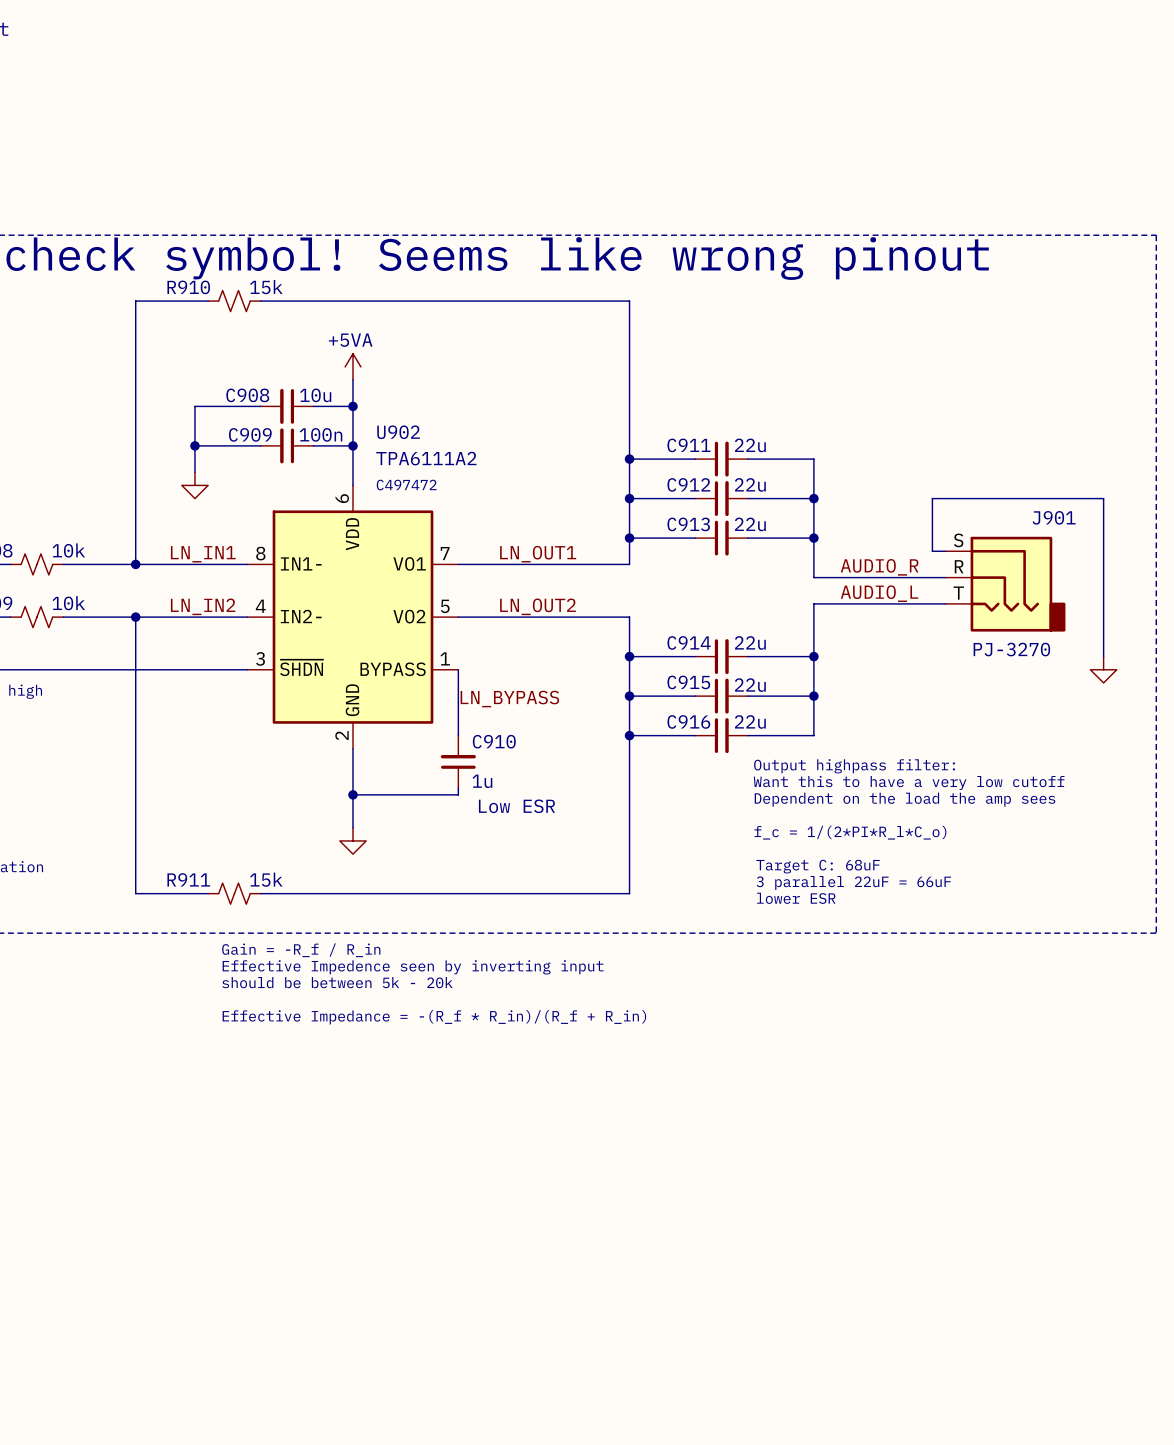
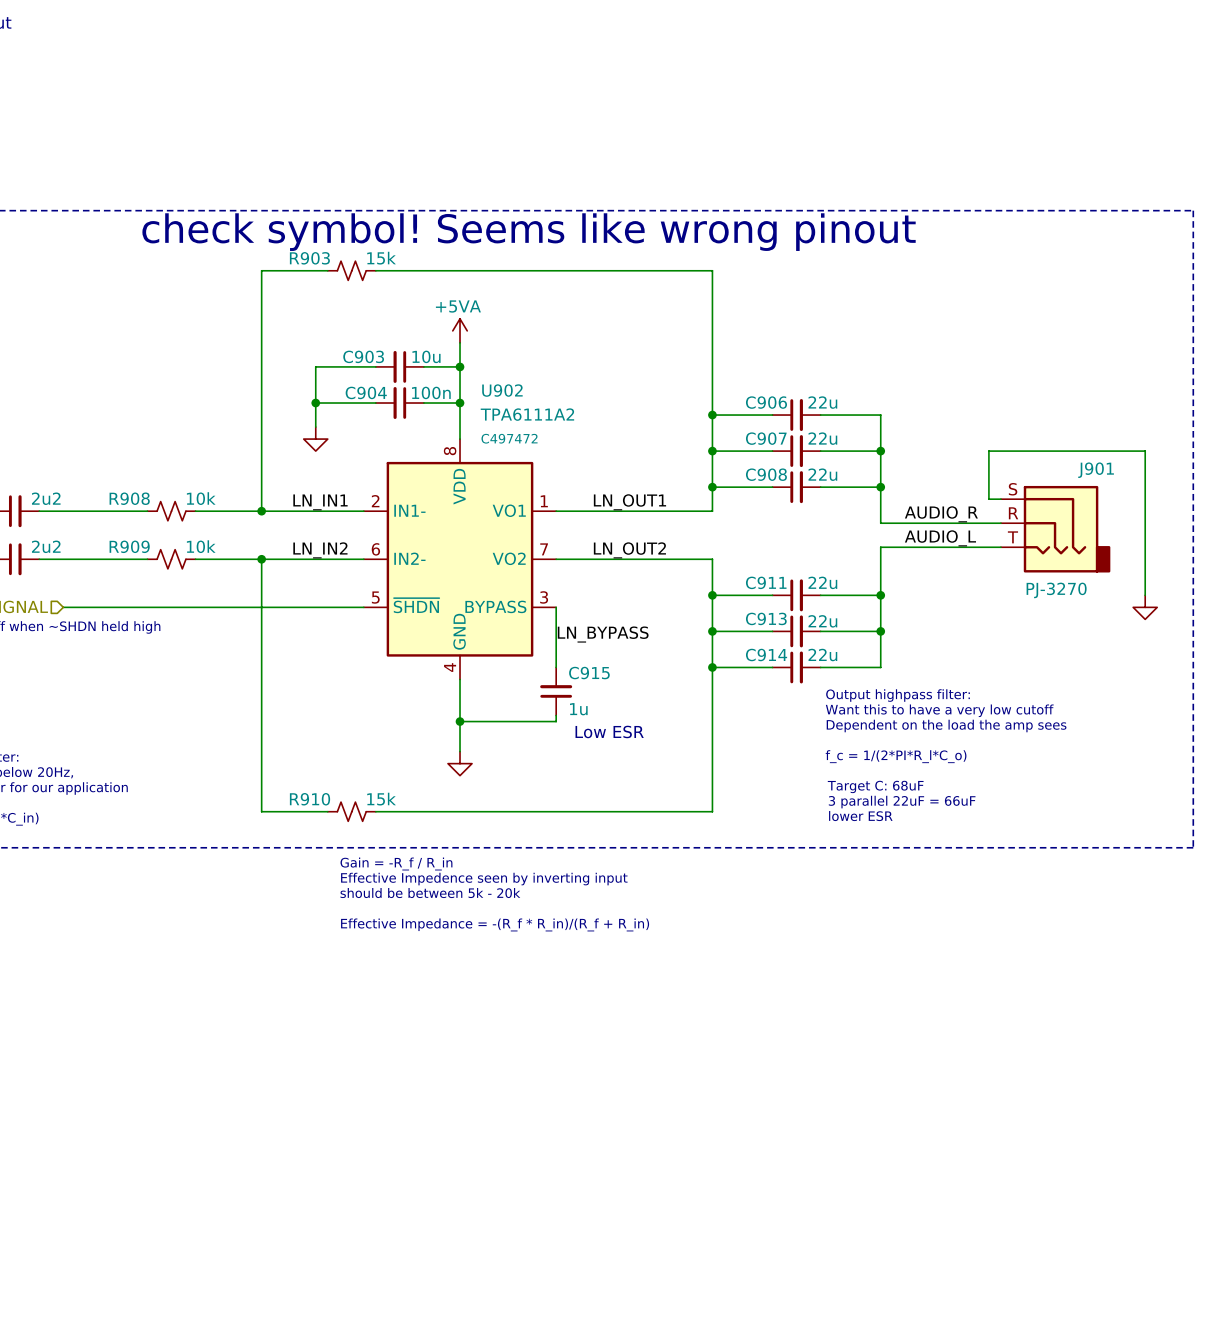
R910 name: R910 (188, 287) -> R903 (309, 258)
C908 name: C908 (247, 395) -> C903 (363, 356)
C909 name: C909 (250, 434) -> C904 (366, 392)
C911 name: C911 (689, 445) -> C906 (766, 402)
C912 name: C912 (688, 484) -> C907 (766, 438)
U902 pin number: 6 (342, 498) -> 8 (450, 451)
C913 name: C913 (688, 524) -> C908 (766, 474)
U902 pin number: 8 (260, 553) -> 2 (375, 501)
U902 pin number: 7 (445, 553) -> 1 (544, 501)
U902 pin number: 4 (260, 606) -> 6 (375, 549)
U902 pin number: 5 (445, 606) -> 7 (544, 549)
C914 name: C914 (689, 642) -> C911 (766, 582)
U902 pin number: 3 (260, 658) -> 5 (375, 597)
U902 pin number: 1 (445, 658) -> 3 (544, 597)
C915 name: C915 (688, 682) -> C913 (766, 618)
C916 name: C916 (688, 721) -> C914 (766, 655)
U902 pin number: 2 (342, 735) -> 4 (450, 667)
C910 name: C910 (494, 741) -> C915 (589, 673)
R911 name: R911 (188, 879) -> R910 (310, 799)

